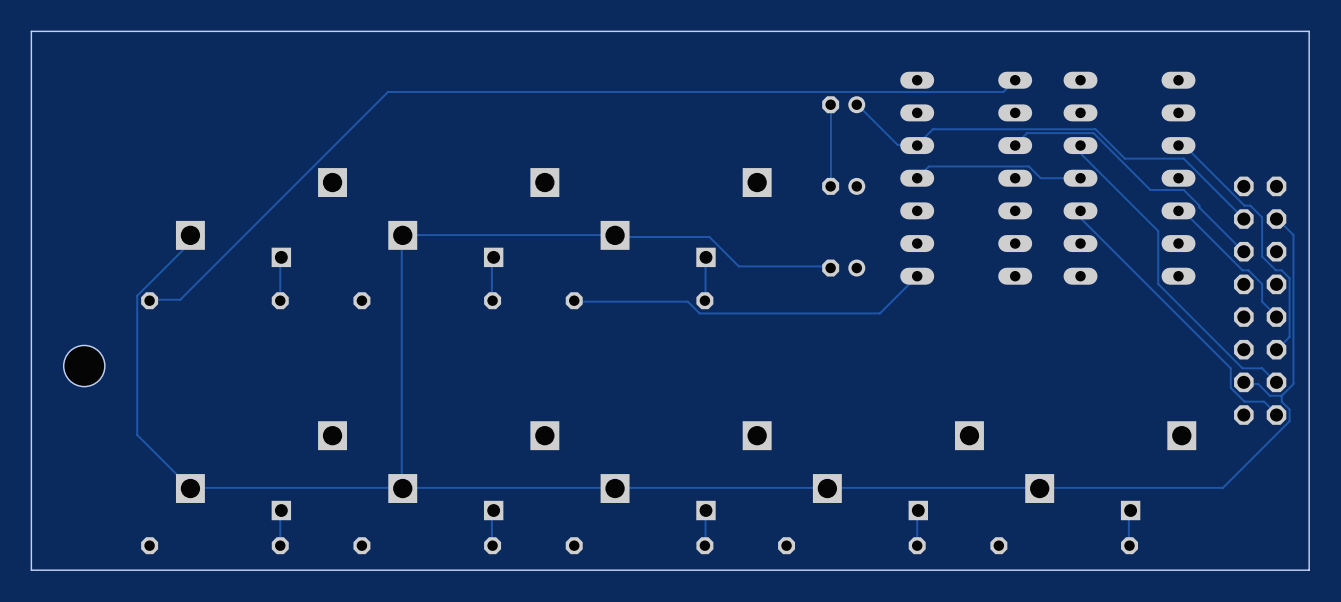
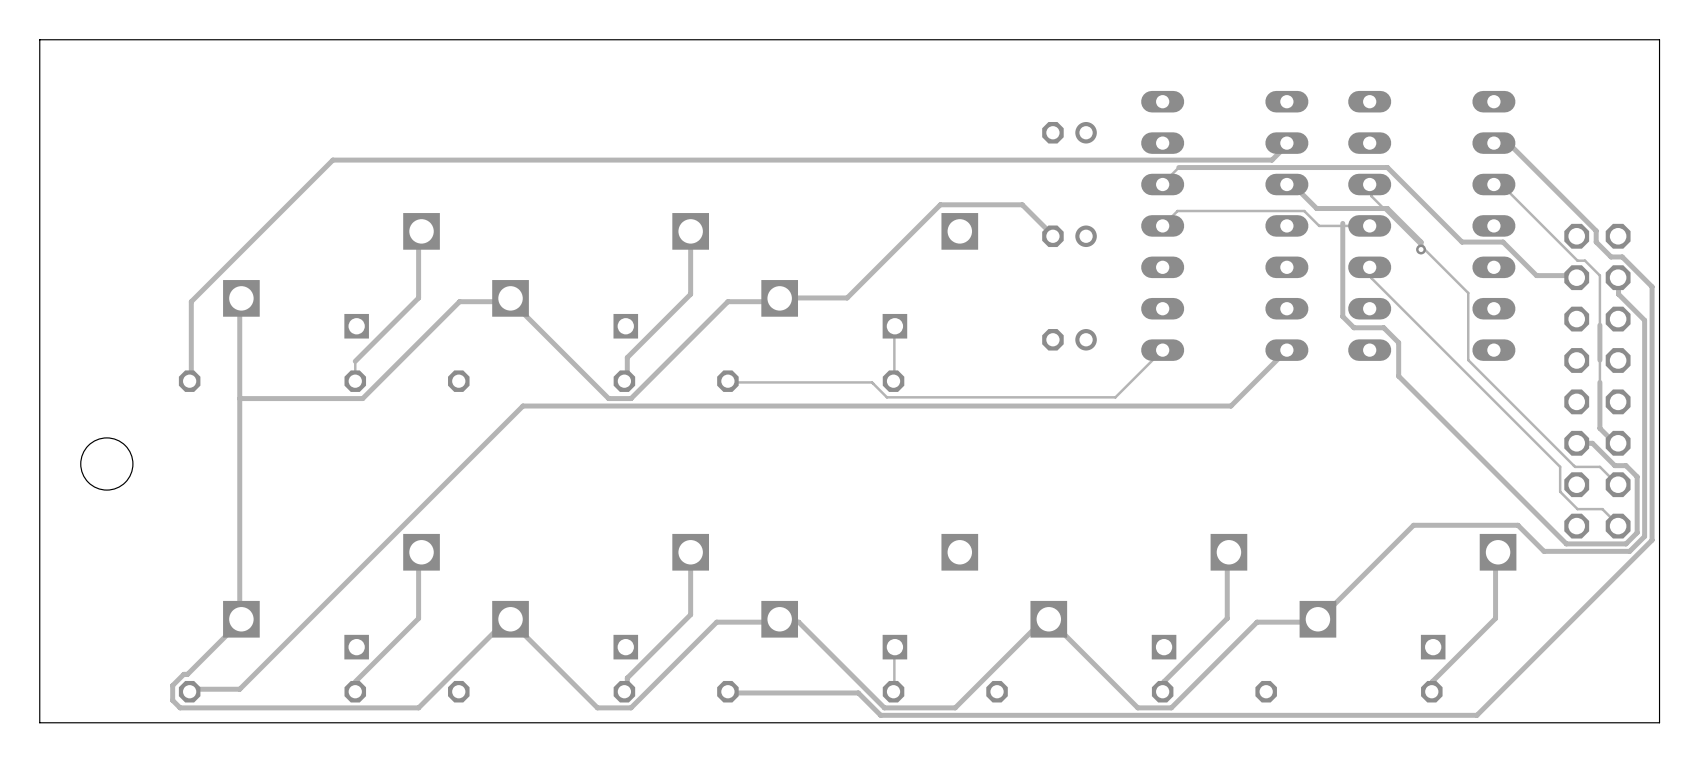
track: (1015, 80) (1003, 91) (388, 91) (180, 299) (150, 299) -> (1286, 143) (1271, 160) (332, 160) (191, 301) (191, 379)
track: (830, 104) (830, 186) -> (239, 398) (362, 398) (459, 301) (508, 301) (510, 298) (608, 398) (631, 398) (727, 301) (776, 301) (780, 297) (847, 297) (940, 204) (1022, 204) (1052, 236)
track: (856, 104) (897, 144) (917, 144) -> none
track: none -> (1493, 143) (1495, 145) (1510, 145) (1596, 230) (1596, 242) (1611, 256) (1622, 256) (1652, 286) (1652, 540) (1476, 715) (880, 715) (858, 692) (727, 691)
track: (929, 132) (932, 129) (1095, 129) (1124, 158) (1183, 158) (1243, 219) -> (1178, 167) (1387, 167) (1462, 242) (1503, 242) (1536, 275) (1573, 275) (1576, 277)
track: (1015, 145) (1026, 133) (1093, 133) (1150, 189) (1183, 189) (1243, 251) -> (1286, 184) (1286, 186) (1294, 186) (1316, 208) (1387, 208) (1421, 242) (1421, 249)
track: none -> (1342, 223) (1342, 316) (1353, 327) (1383, 327) (1398, 342) (1398, 376) (1566, 543) (1625, 543) (1637, 532) (1637, 476) (1625, 465) (1614, 465) (1592, 443) (1576, 443)
via: none -> (1421, 249)
track: (1178, 210) (1183, 211) (1242, 270) (1248, 270) (1262, 284) -> none
track: (1276, 219) (1293, 235) (1293, 384) (1281, 395) -> none
track: (190, 235) (190, 242) (137, 295) (137, 434) (190, 488) (401, 487) -> (241, 298) (239, 301) (239, 618) (241, 619) (187, 674) (183, 674) (172, 685) (172, 700) (180, 707) (418, 707) (508, 618) (597, 707) (631, 707) (716, 622) (776, 622) (779, 619) (780, 622) (798, 622) (884, 707) (955, 707) (1040, 622) (1048, 622) (1048, 619) (1137, 707) (1171, 707) (1257, 622) (1316, 622) (1413, 525) (1517, 525) (1544, 551) (1629, 551) (1644, 536) (1644, 320) (1618, 294) (1618, 277)
track: (1262, 256) (1275, 270) (1281, 270) (1289, 278) (1289, 336) (1276, 349) -> (1599, 325) (1599, 360)
track: (281, 257) (280, 285) -> (421, 231) (418, 234) (418, 297) (355, 361)
track: (493, 257) (491, 258) (492, 300) -> (690, 231) (690, 294) (627, 357) (627, 379) (624, 381)
track: (830, 268) (829, 266) (738, 266) (709, 237) (402, 235) (401, 487) -> none
track: none -> (1286, 350) (1230, 406) (522, 406) (239, 689) (191, 689) (189, 691)
track: (1262, 301) (1276, 317) -> (1599, 382) (1599, 428) (1614, 443) (1618, 443)
track: (1243, 382) (1244, 384) (1258, 384) (1269, 395) (1281, 395) -> none
track: (1281, 395) (1281, 401) (1289, 409) (1289, 421) (1222, 487) (401, 487) -> none
track: (281, 510) (280, 537) -> (421, 552) (418, 555) (418, 618) (355, 681)
track: (493, 510) (491, 511) (492, 545) -> (690, 552) (690, 614) (627, 678) (627, 689) (624, 691)
track: (918, 510) (917, 545) -> (1228, 552) (1227, 555) (1227, 618) (1163, 681) (1162, 691)
track: (1130, 510) (1128, 511) (1129, 545) -> (1498, 552) (1495, 555) (1495, 618) (1432, 681) (1431, 691)

